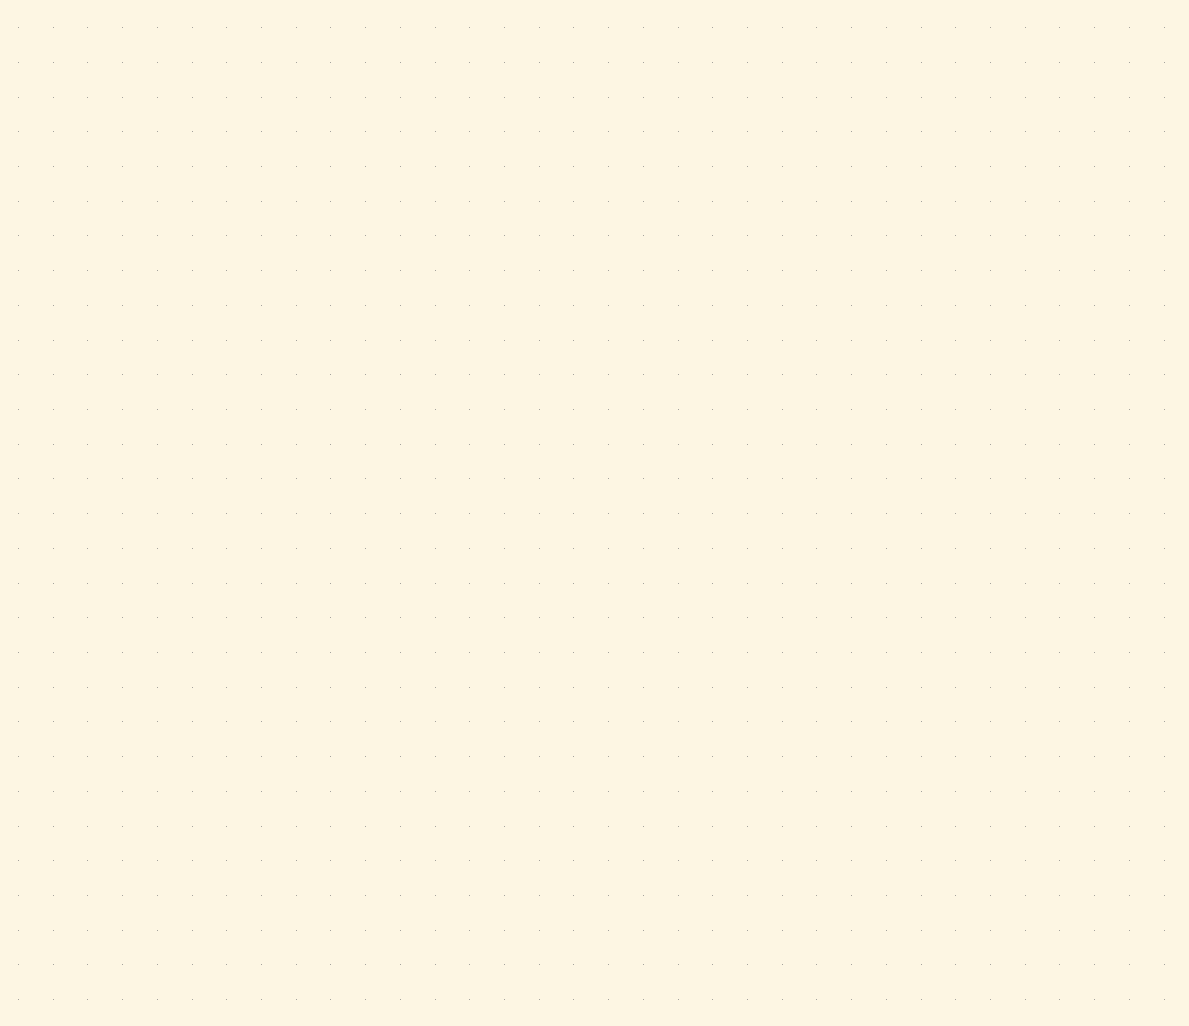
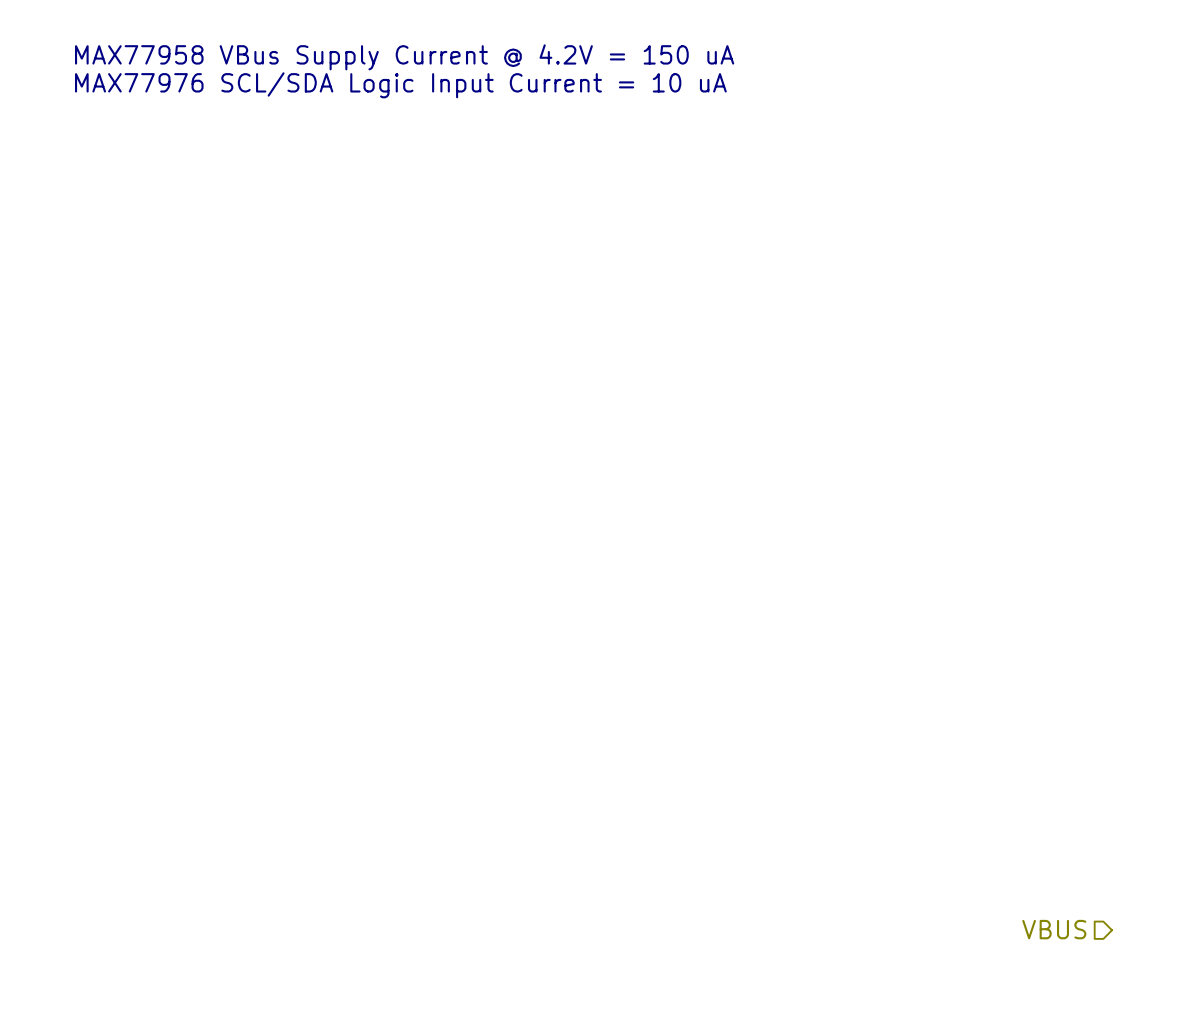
text: none -> MAX77958 VBus Supply Current @ 4.2V = 150 uA (404, 57)
text: none -> MAX77976 SCL/SDA Logic Input Current = 10 uA (400, 85)
hierarchical label: none -> VBUS (1054, 929)

